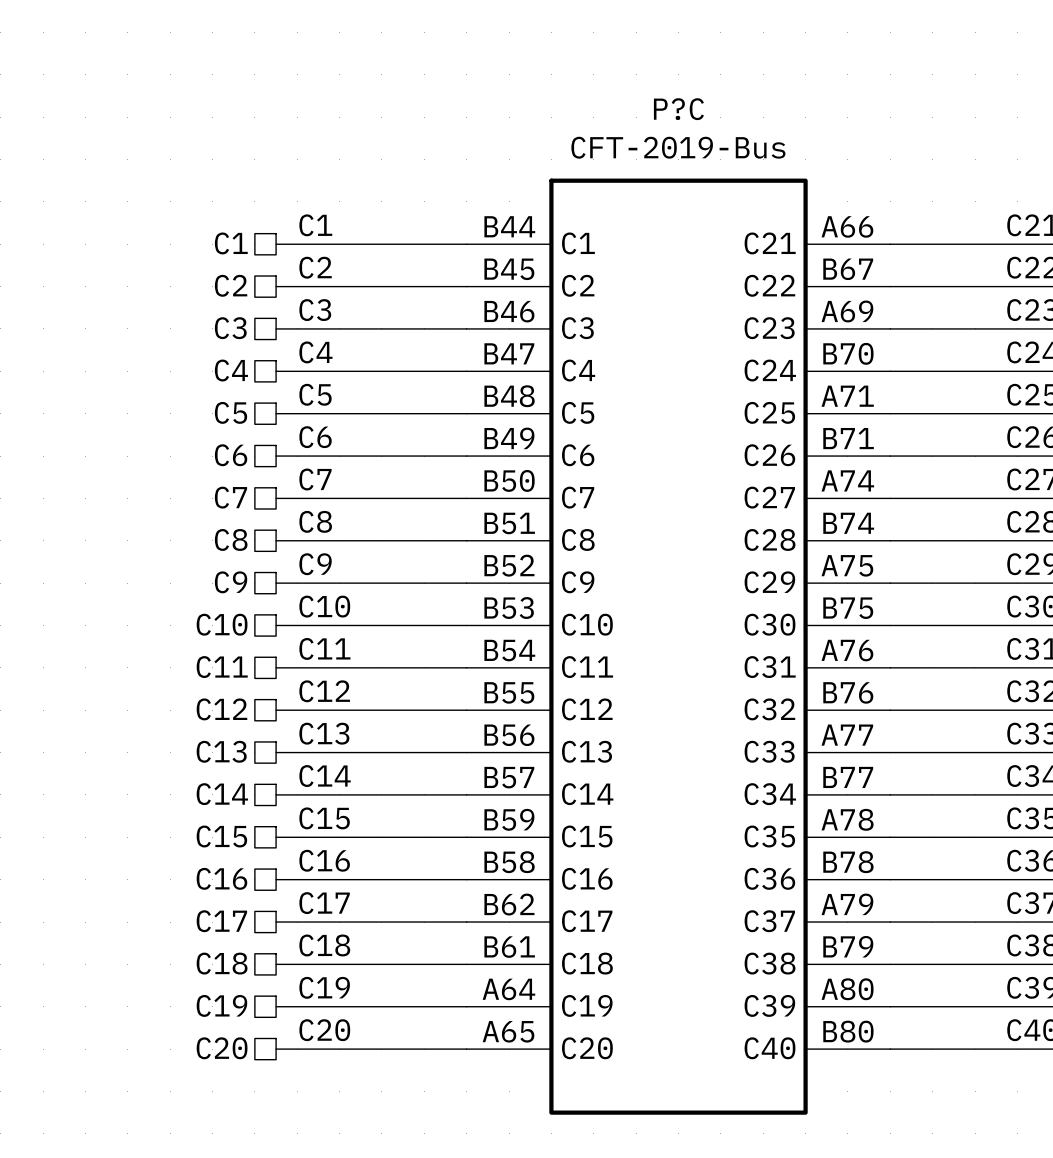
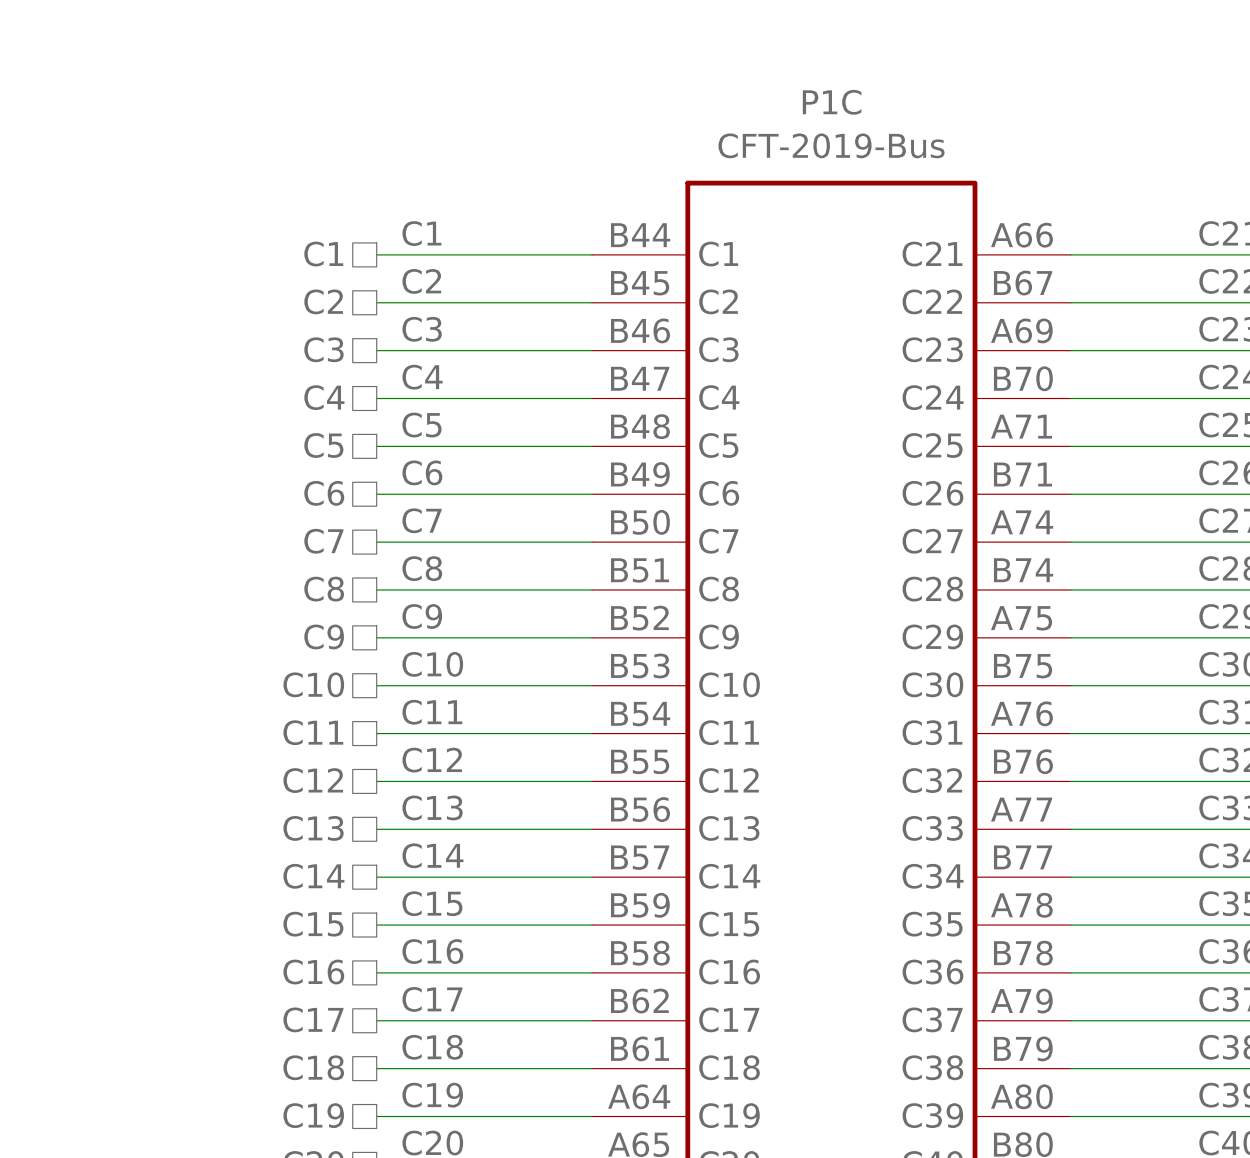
P?C name: P?C (678, 109) -> P1C (832, 102)

